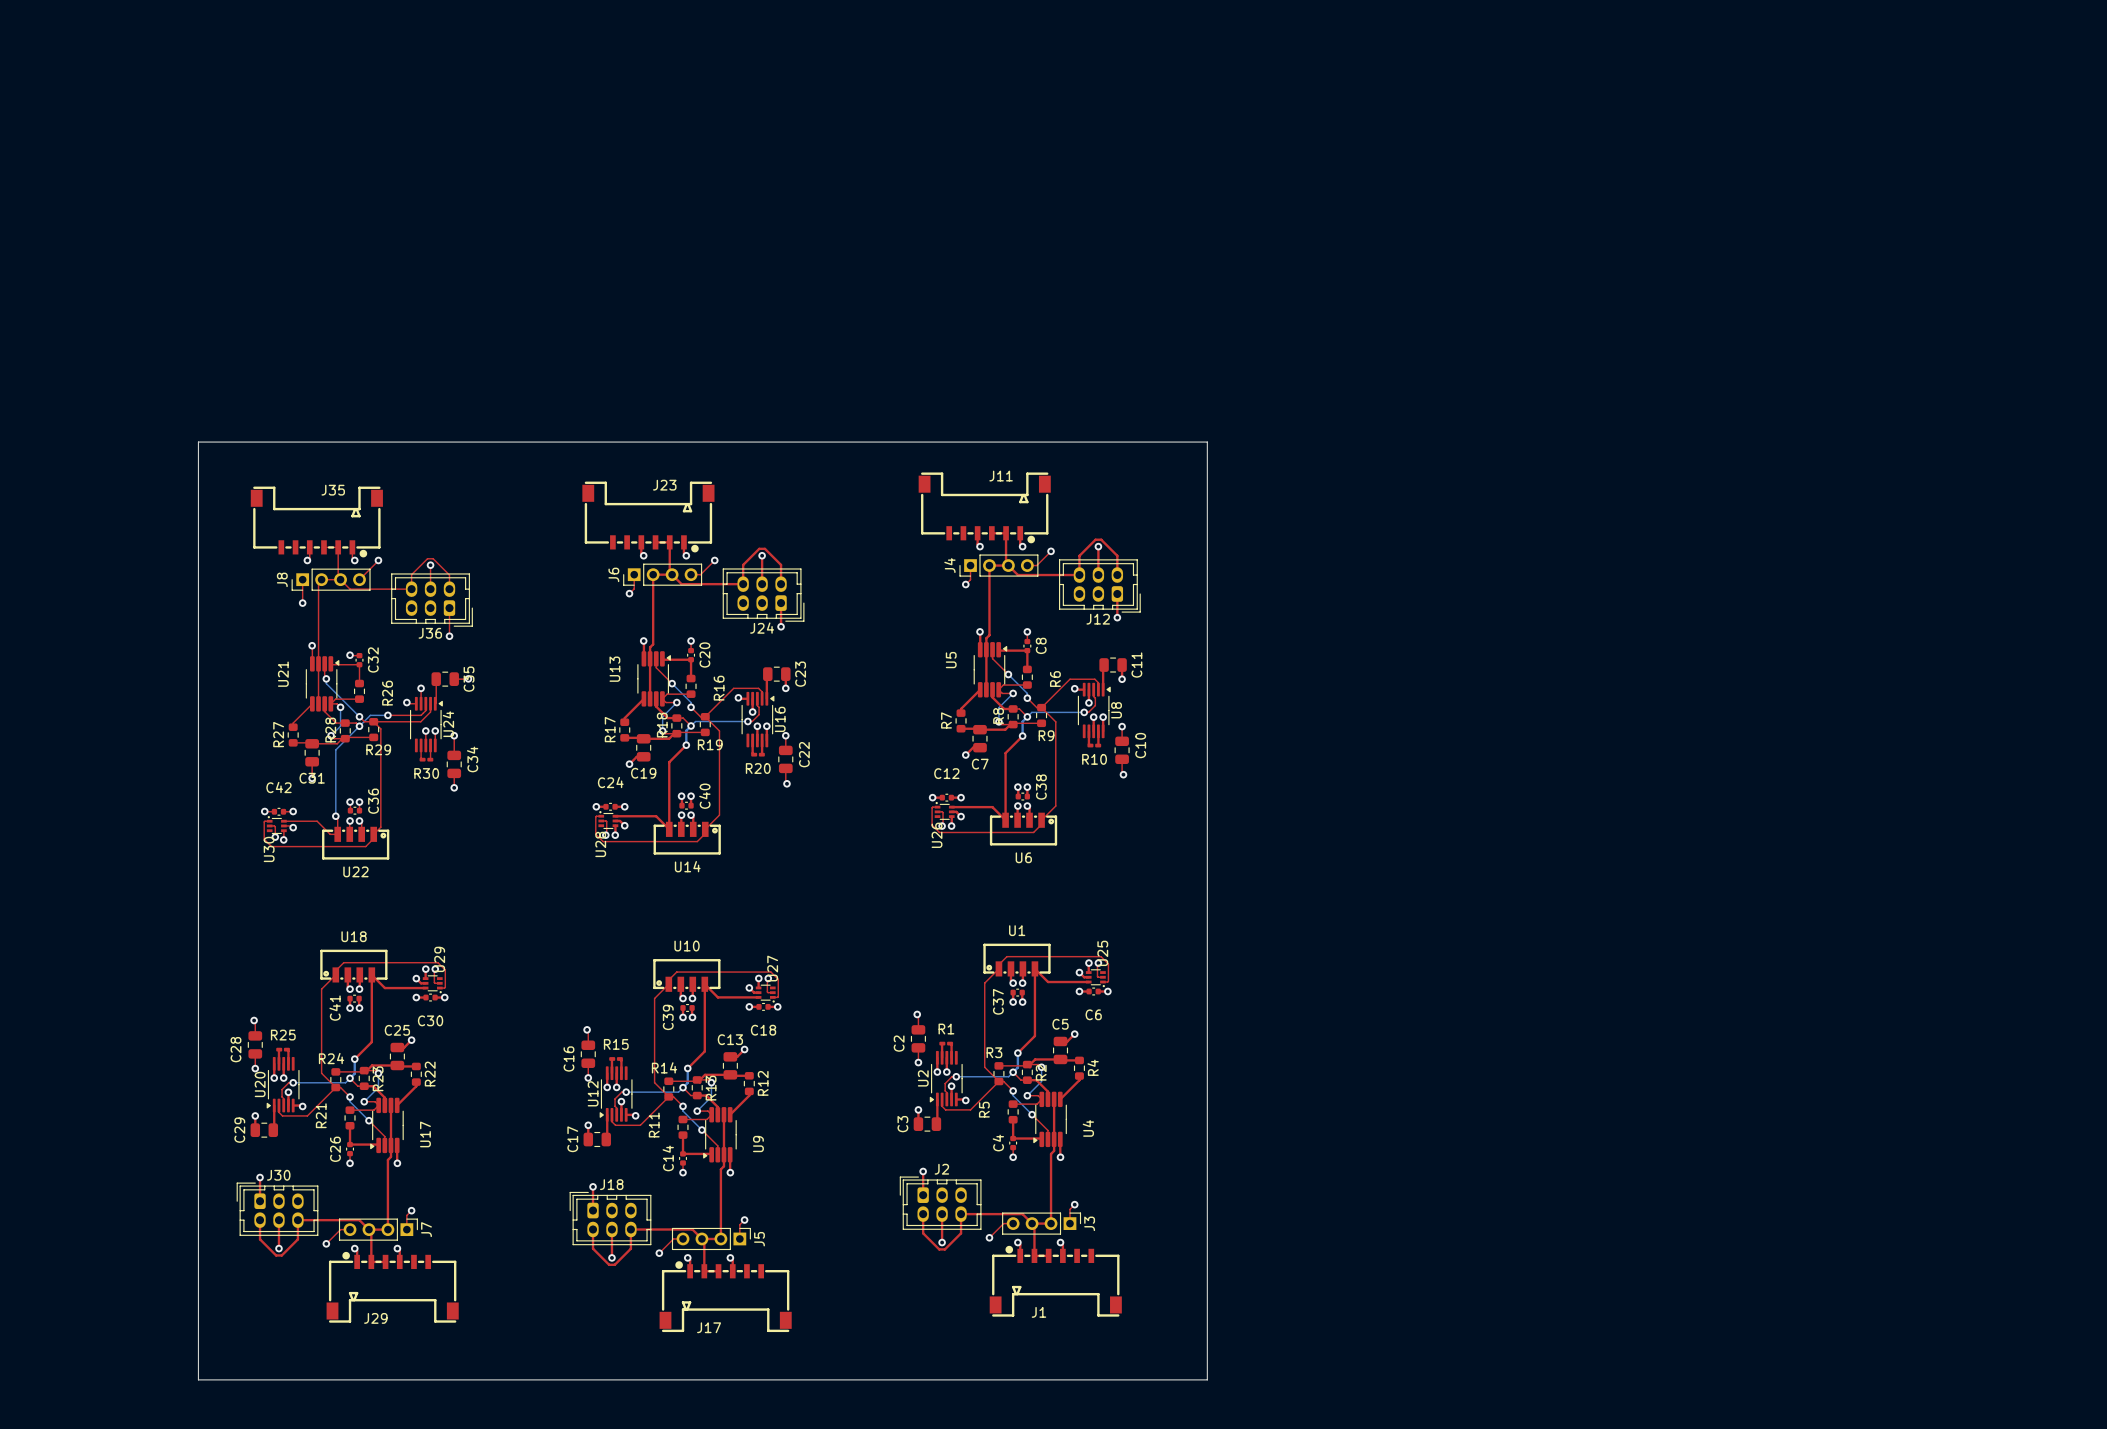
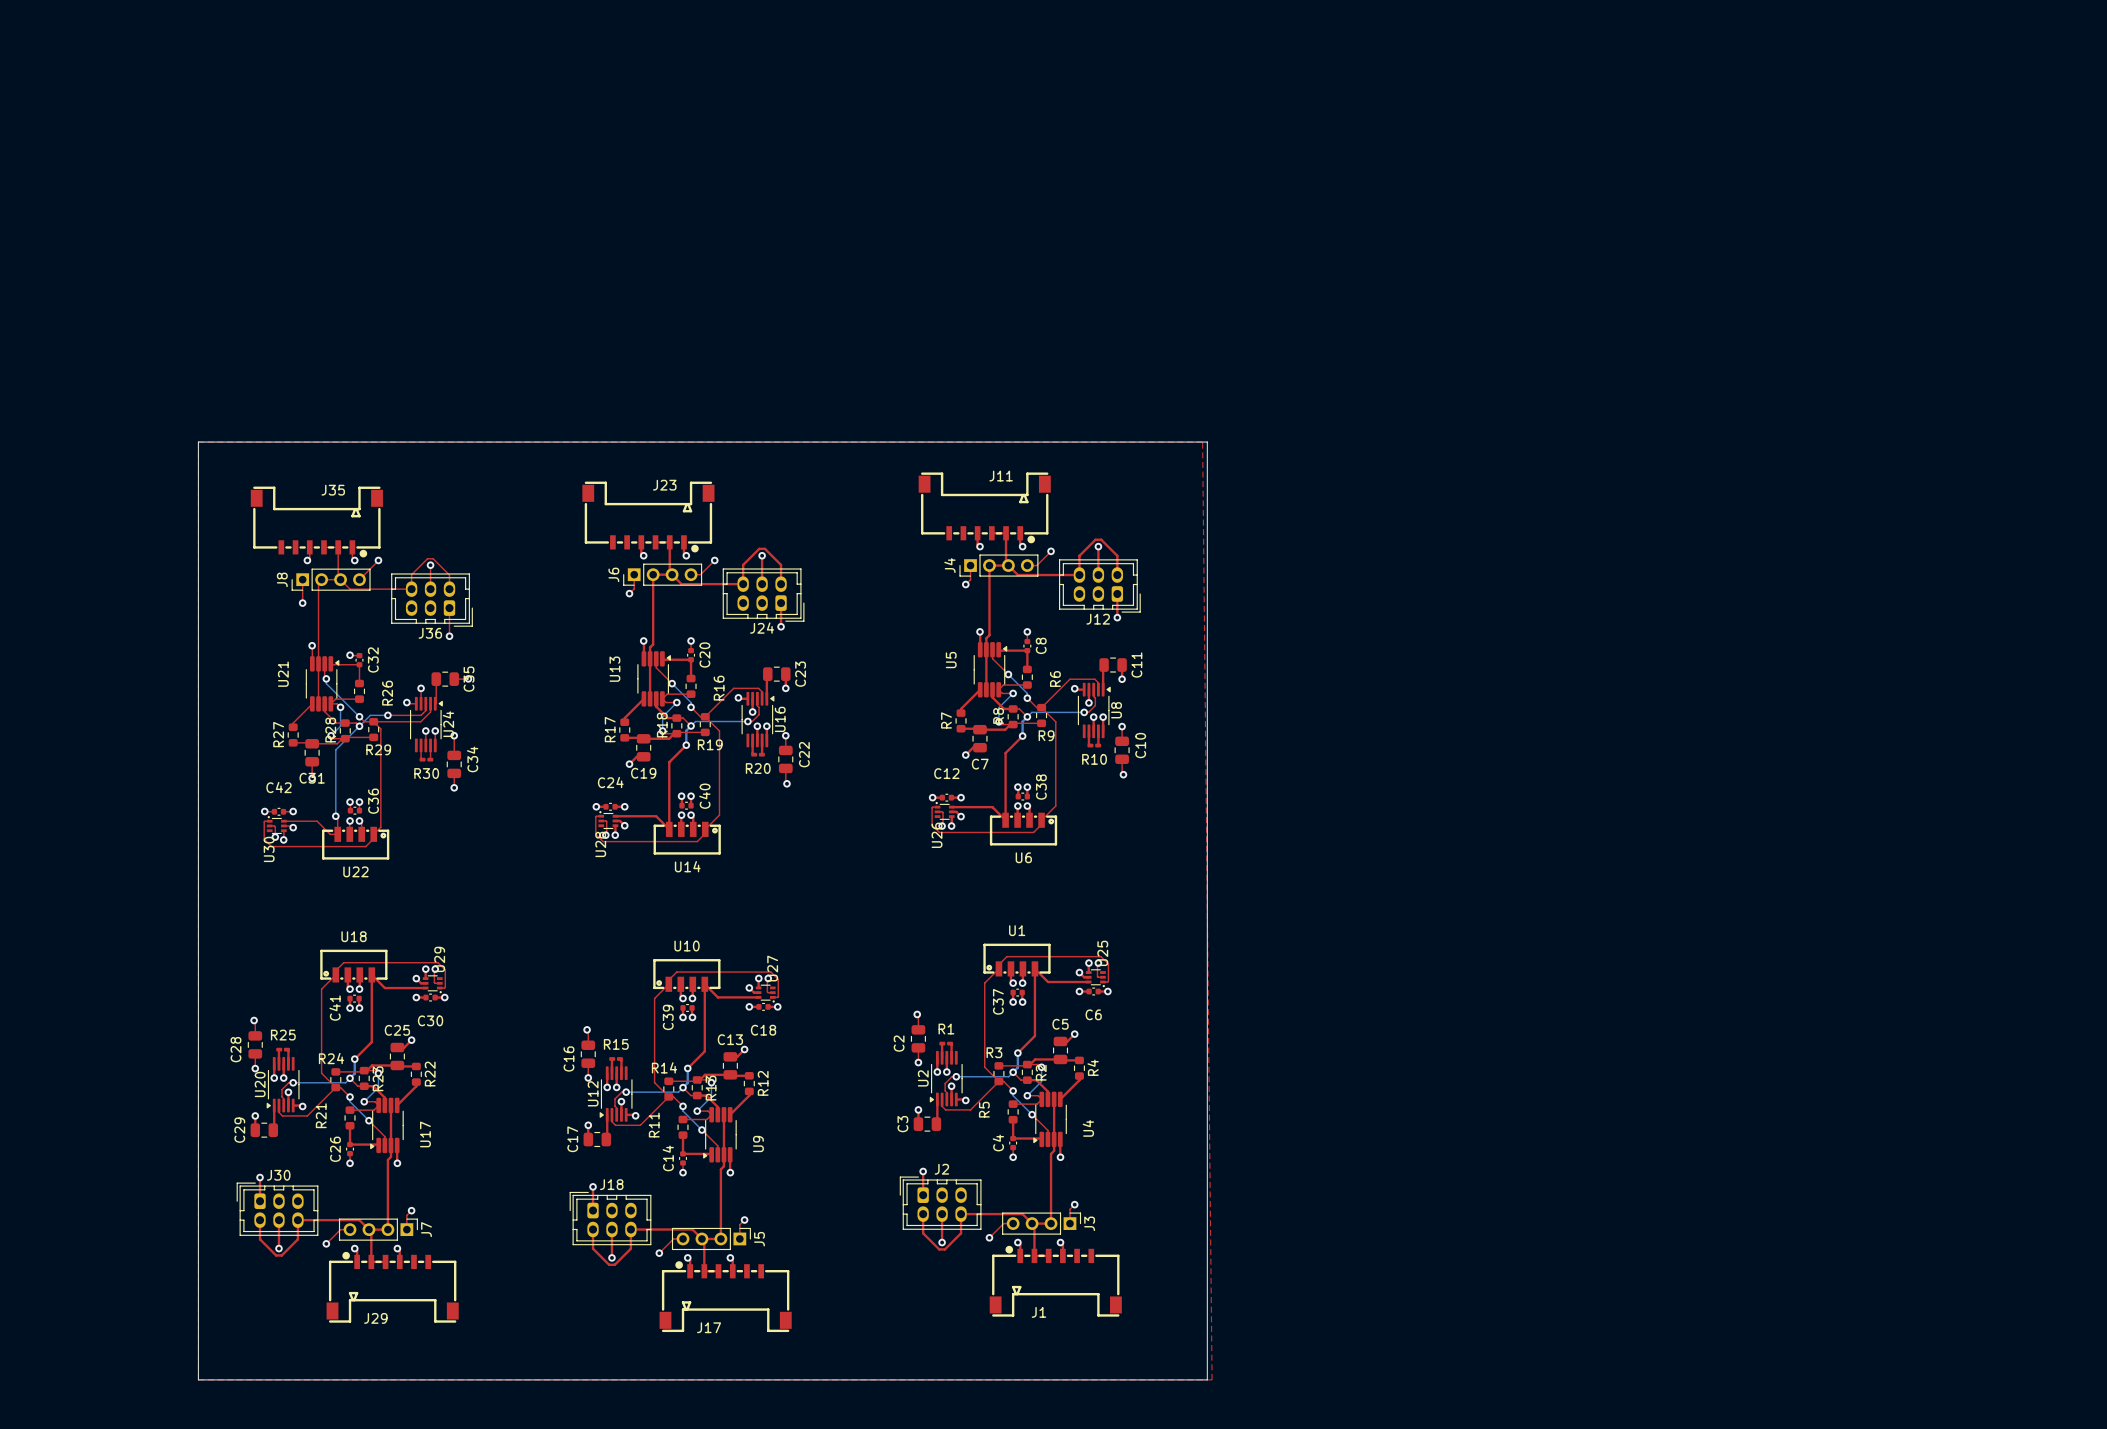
top zone outline: none -> (198, 442) (198, 1379) (1212, 1379) (1202, 442) (198, 442)

